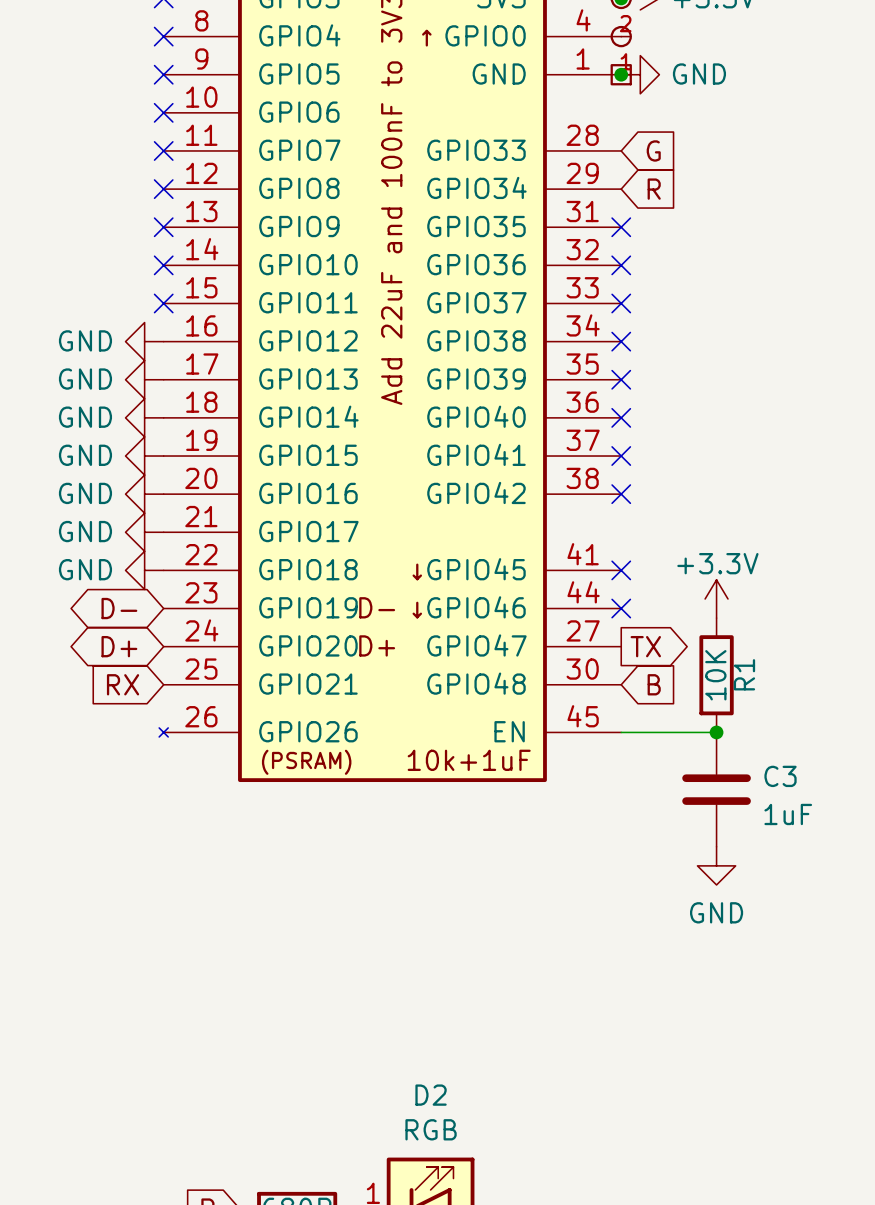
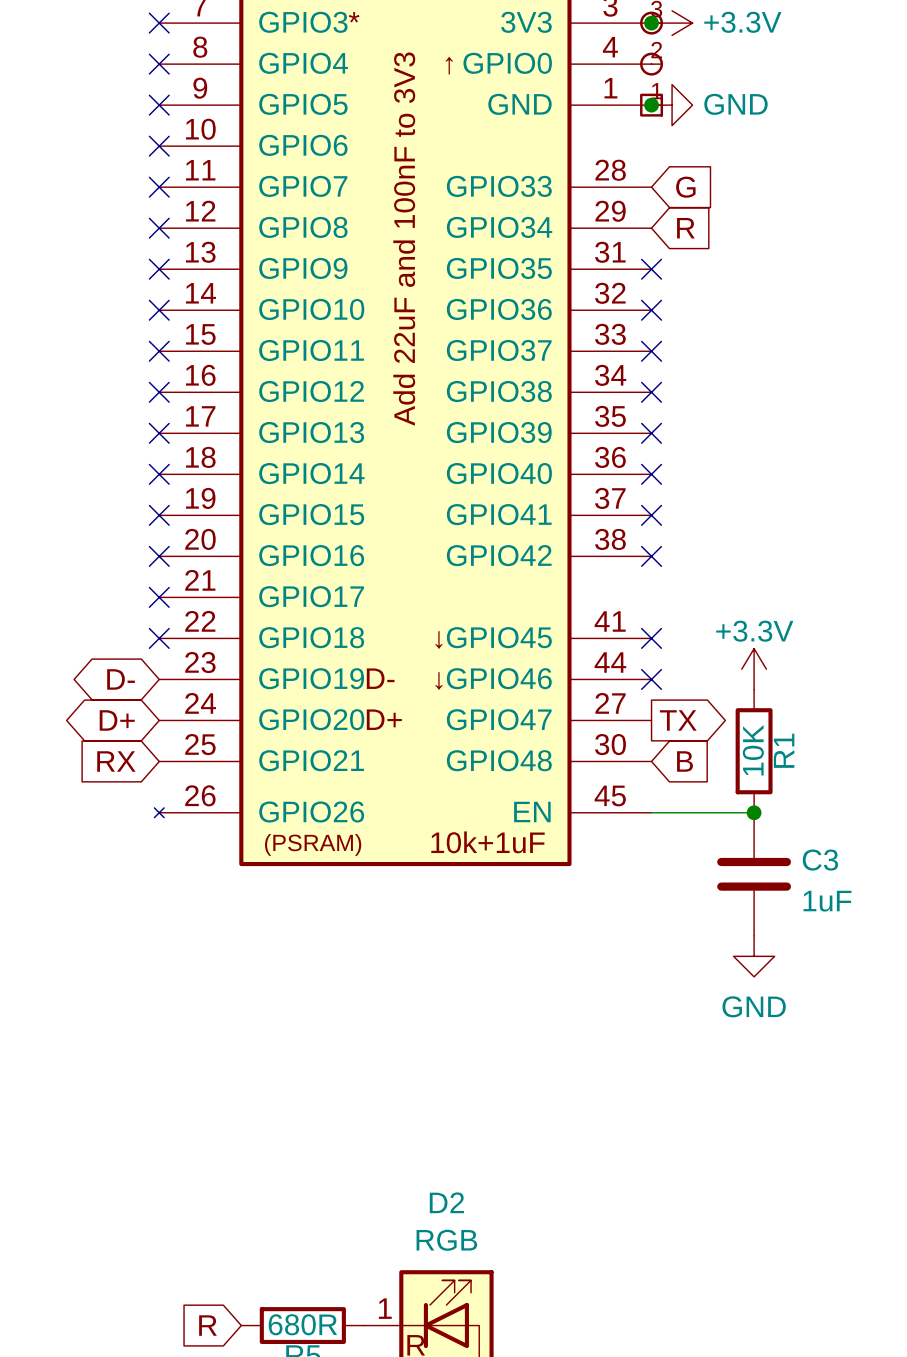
power symbol: GND (144, 341) -> none
no-connect mark: none -> (159, 392)
power symbol: GND (144, 379) -> none
no-connect mark: none -> (159, 433)
power symbol: GND (144, 417) -> none
no-connect mark: none -> (159, 474)
power symbol: GND (144, 456) -> none
no-connect mark: none -> (159, 515)
power symbol: GND (144, 494) -> none
no-connect mark: none -> (159, 556)
power symbol: GND (144, 532) -> none
no-connect mark: none -> (159, 597)
power symbol: GND (144, 570) -> none
no-connect mark: none -> (159, 638)

